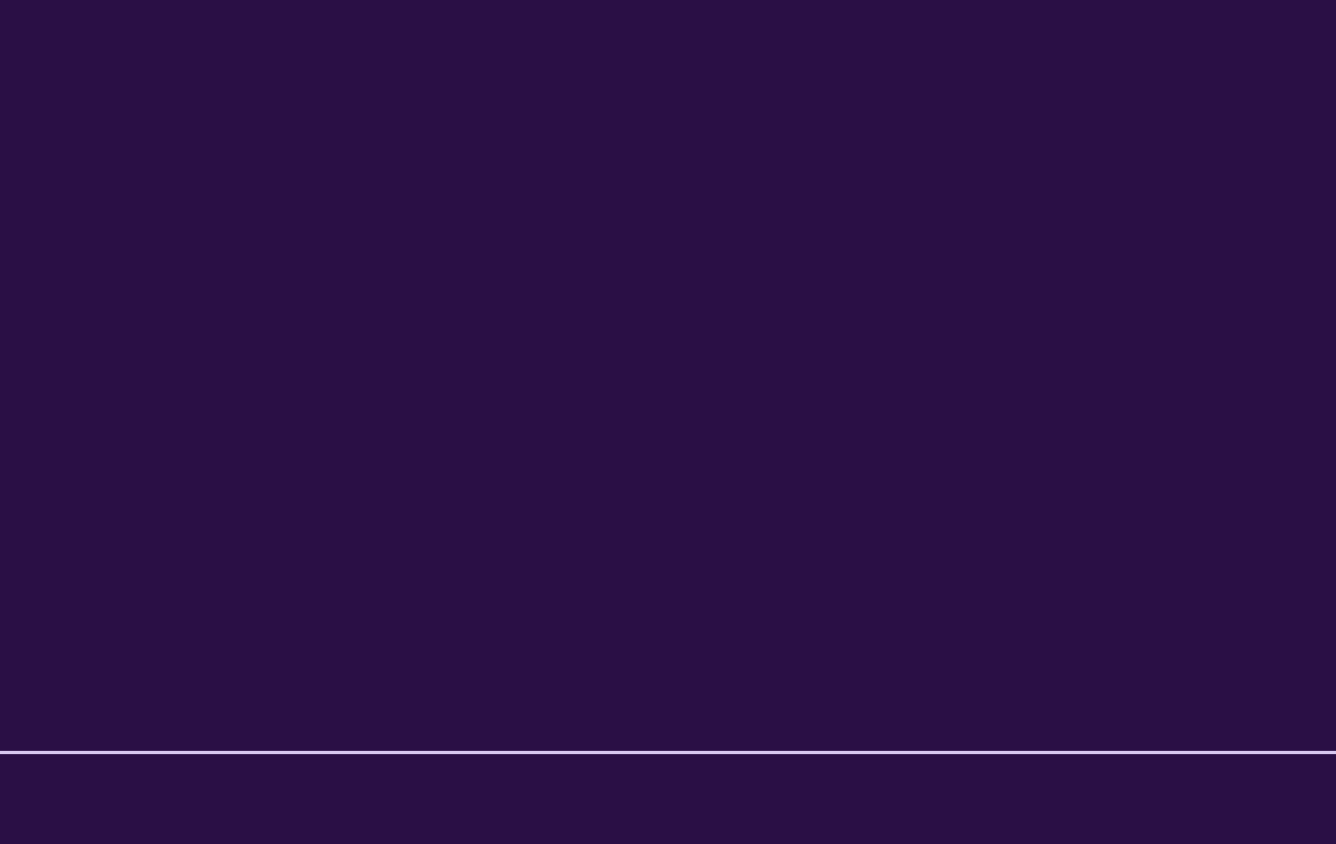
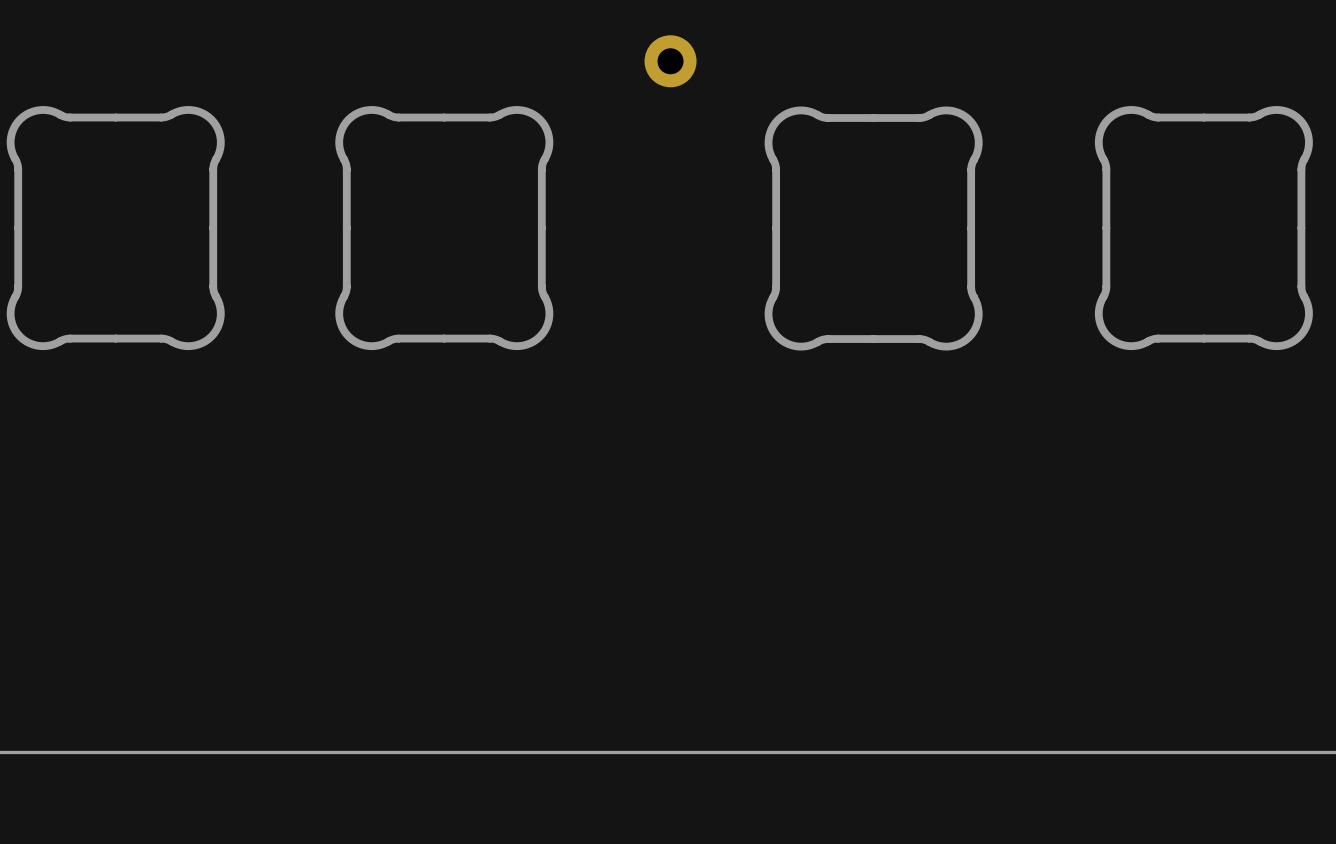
via: none -> (670, 61)
part: none -> (115, 228)
part: none -> (444, 228)
part: none -> (873, 228)
part: none -> (1203, 228)

